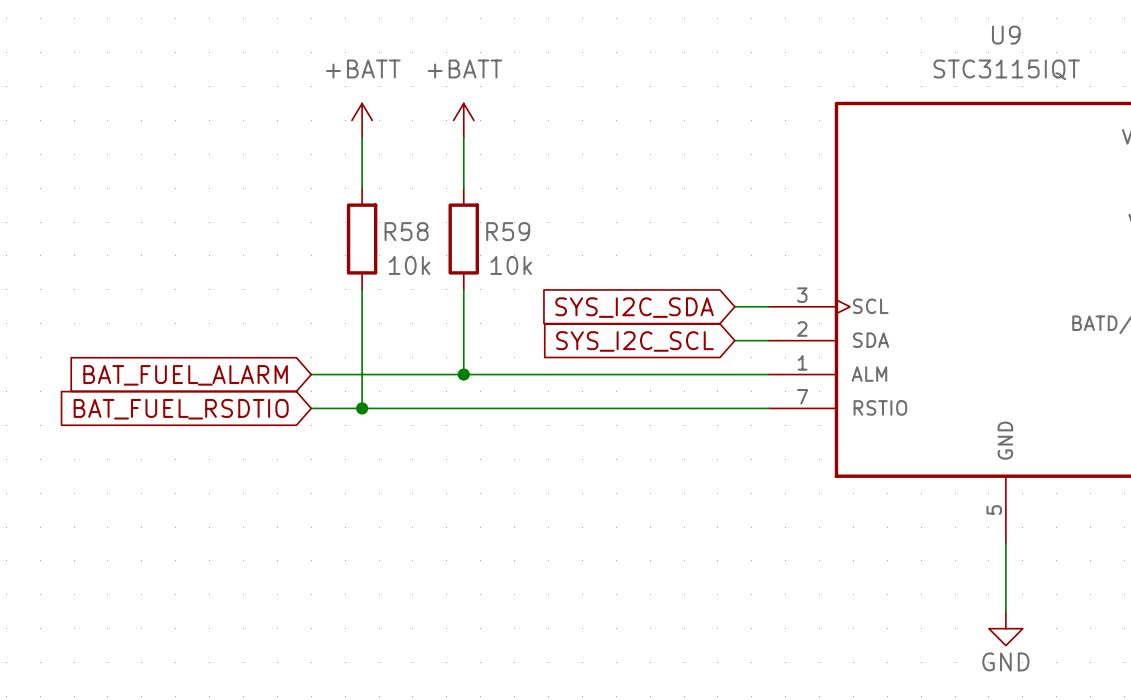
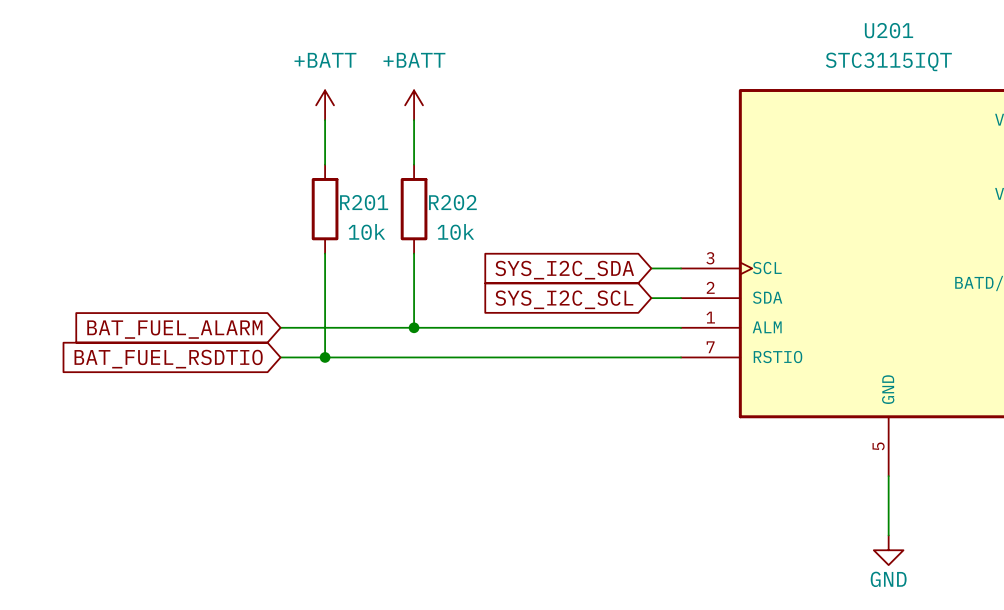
U9 name: U9 (1006, 35) -> U201 (889, 30)
R58 name: R58 (406, 231) -> R201 (364, 202)
R59 name: R59 (508, 231) -> R202 (452, 202)

